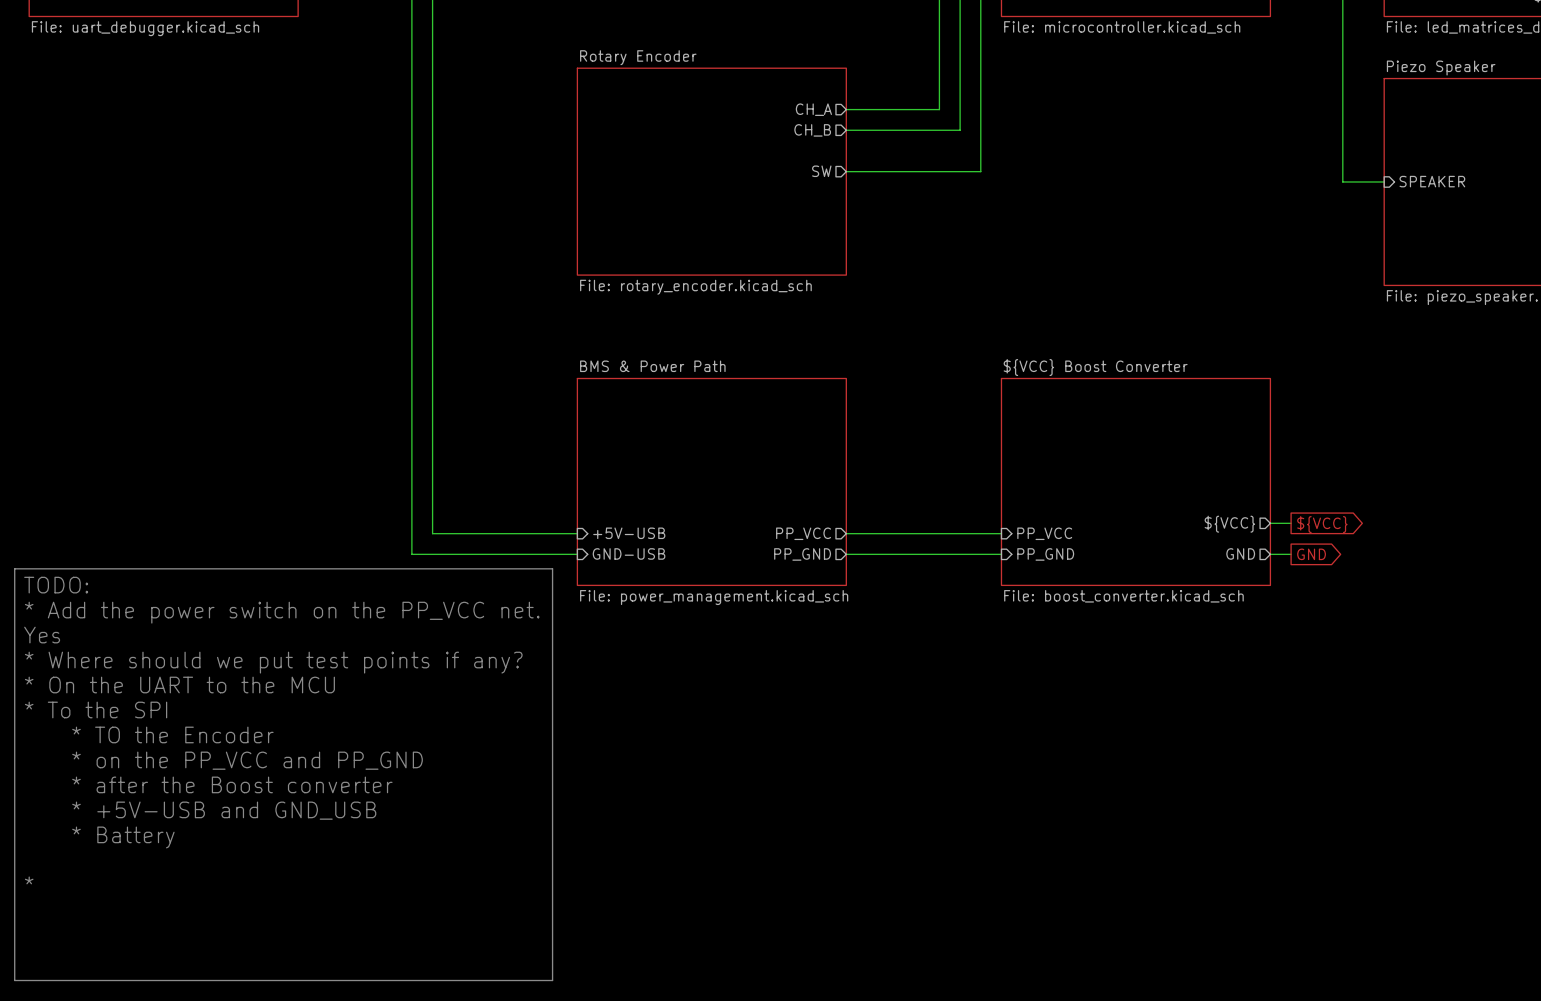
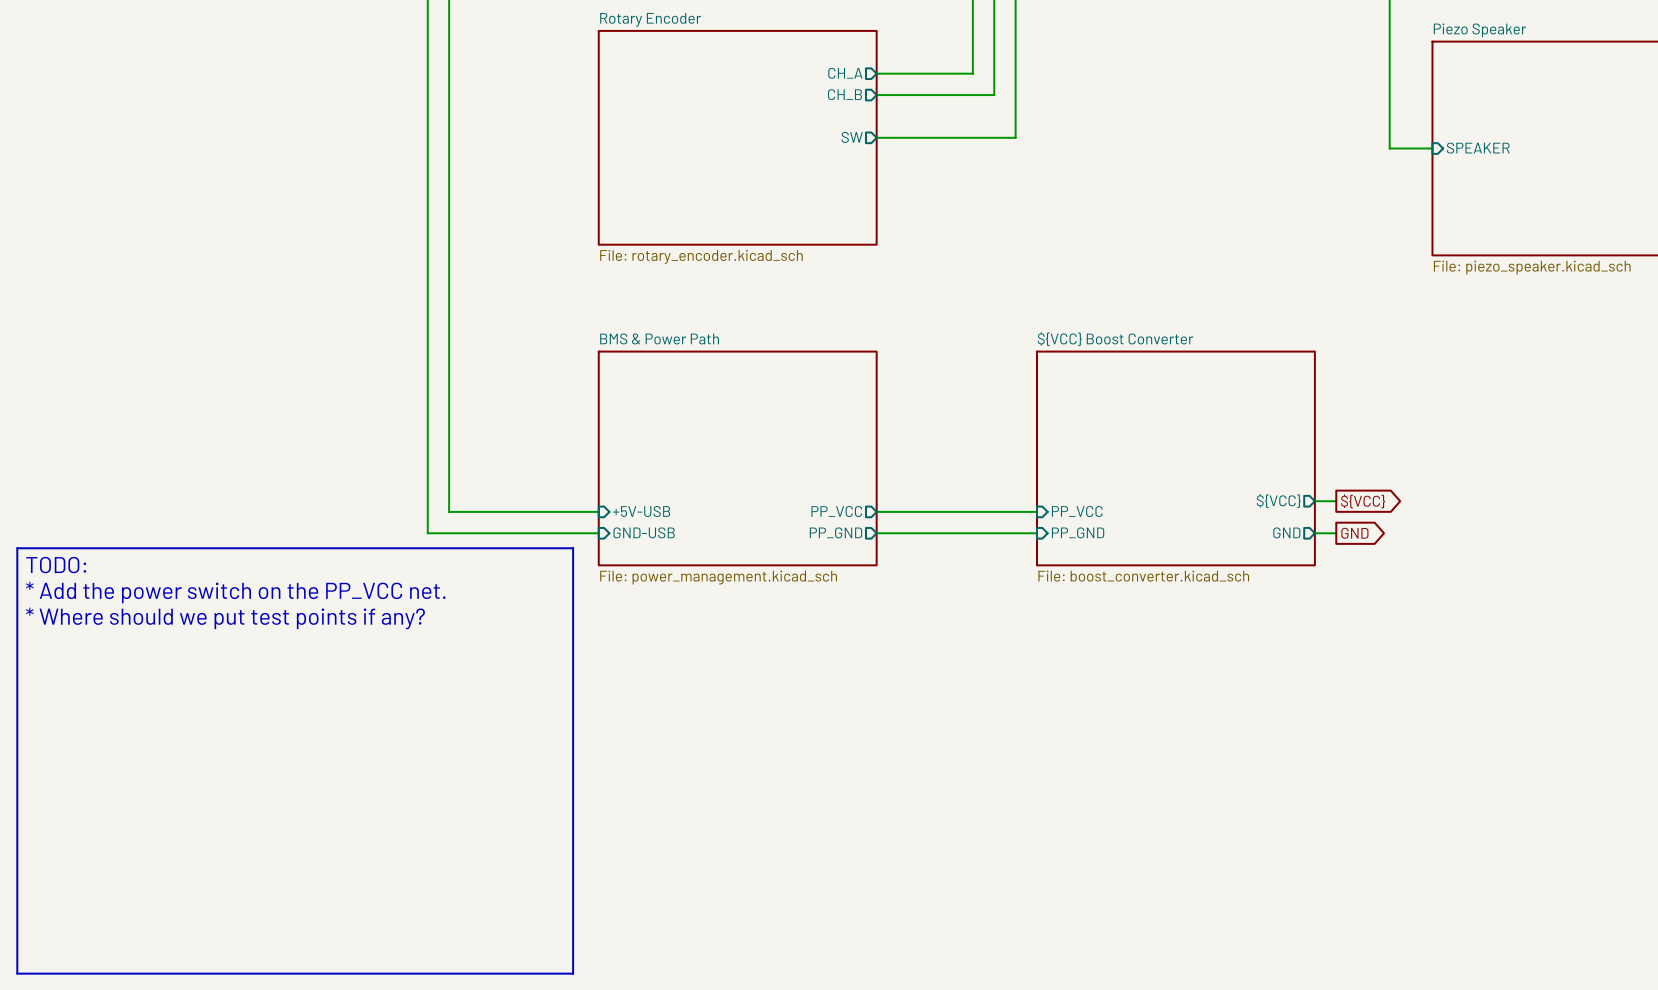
text: Yes (42, 635) -> * Where should we put test points if any? (225, 618)
text: * Where should we put test points if any? (273, 662) -> none
text: * On the UART to the MCU (179, 685) -> none
text: * To the SPI (96, 709) -> none
text: * TO the Encoder (172, 734) -> none
text: * on the PP_VCC and PP_GND (247, 760) -> none
text: * after the Boost converter (232, 784) -> none
text: * +5V-USB and GND_USB (224, 810) -> none
text: * Battery (123, 837) -> none
text: * (29, 880) -> none

